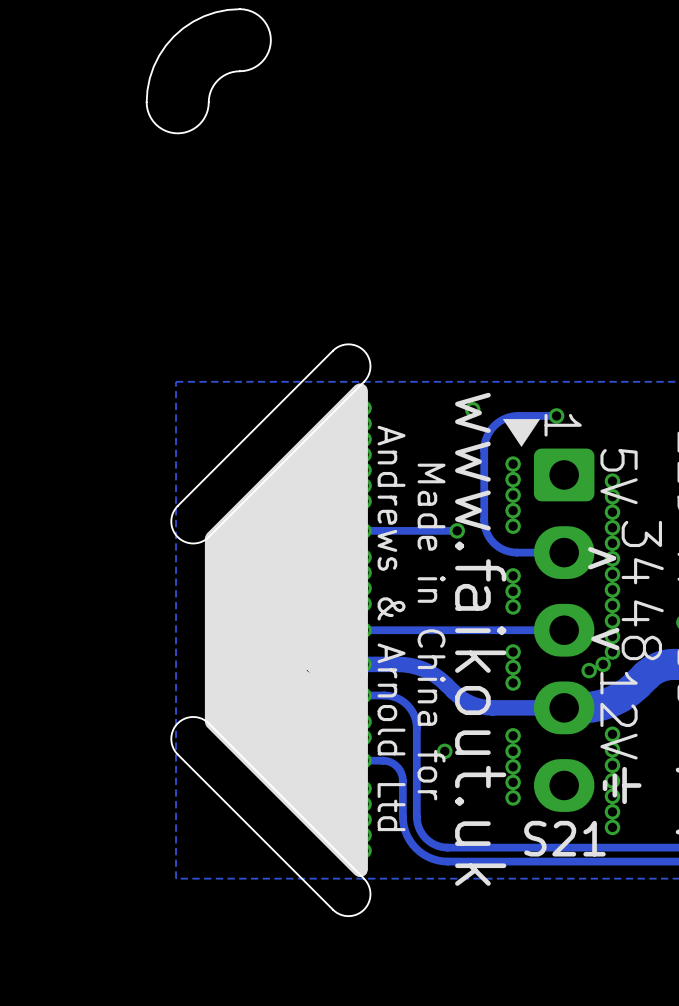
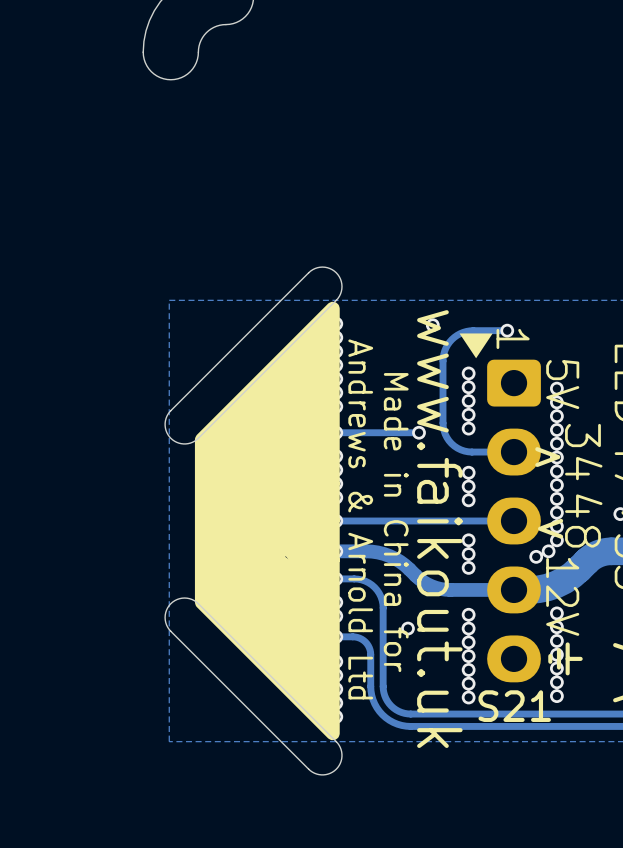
via: none -> (468, 683)
via: none -> (468, 697)

